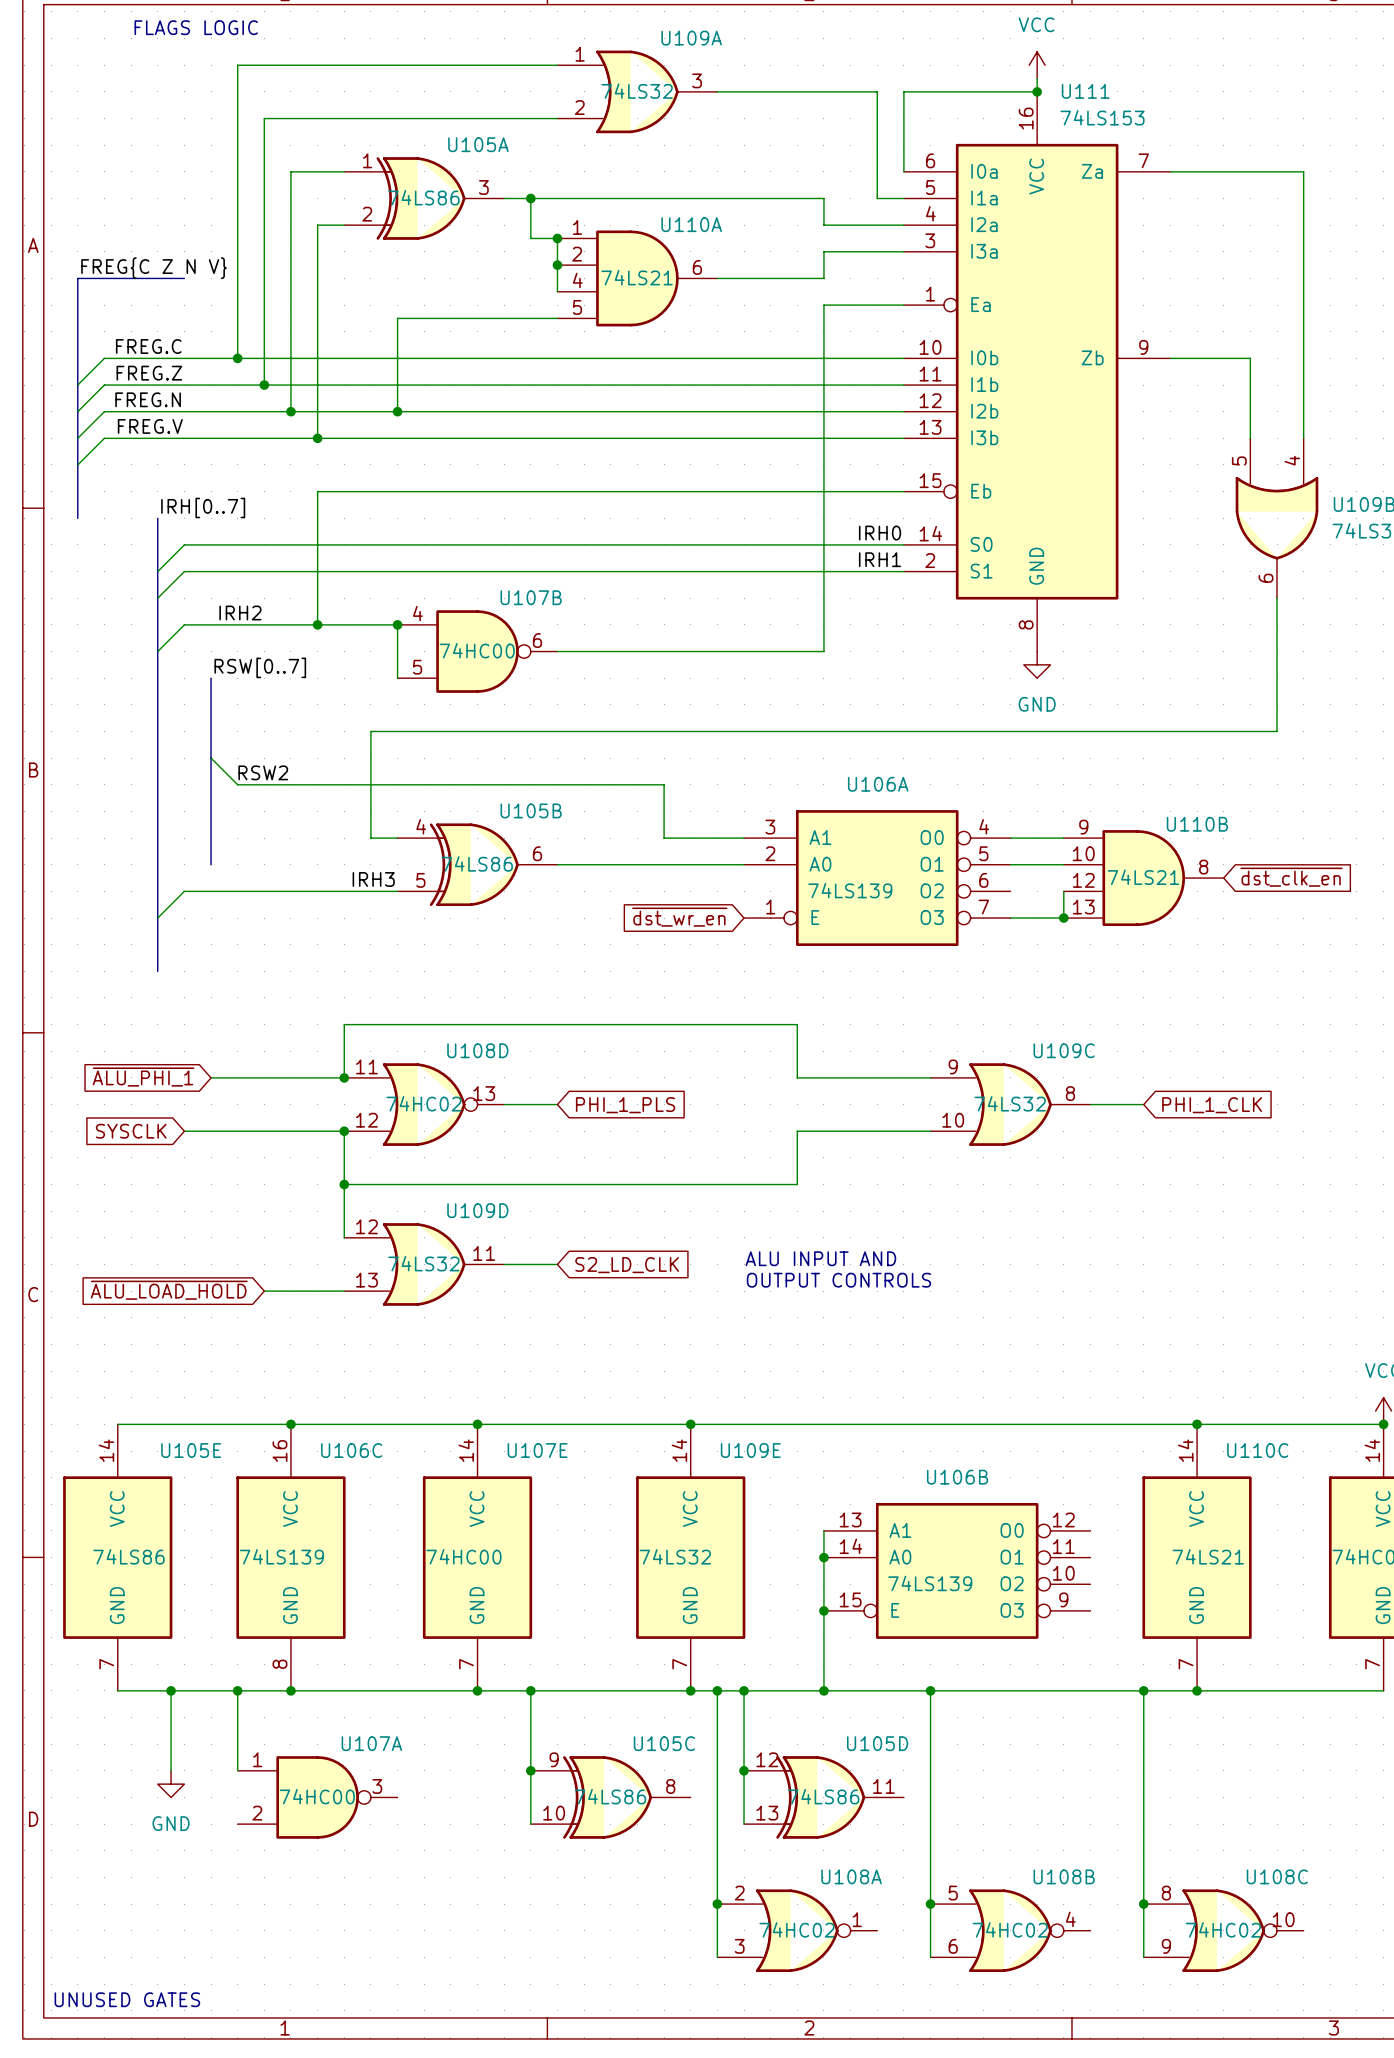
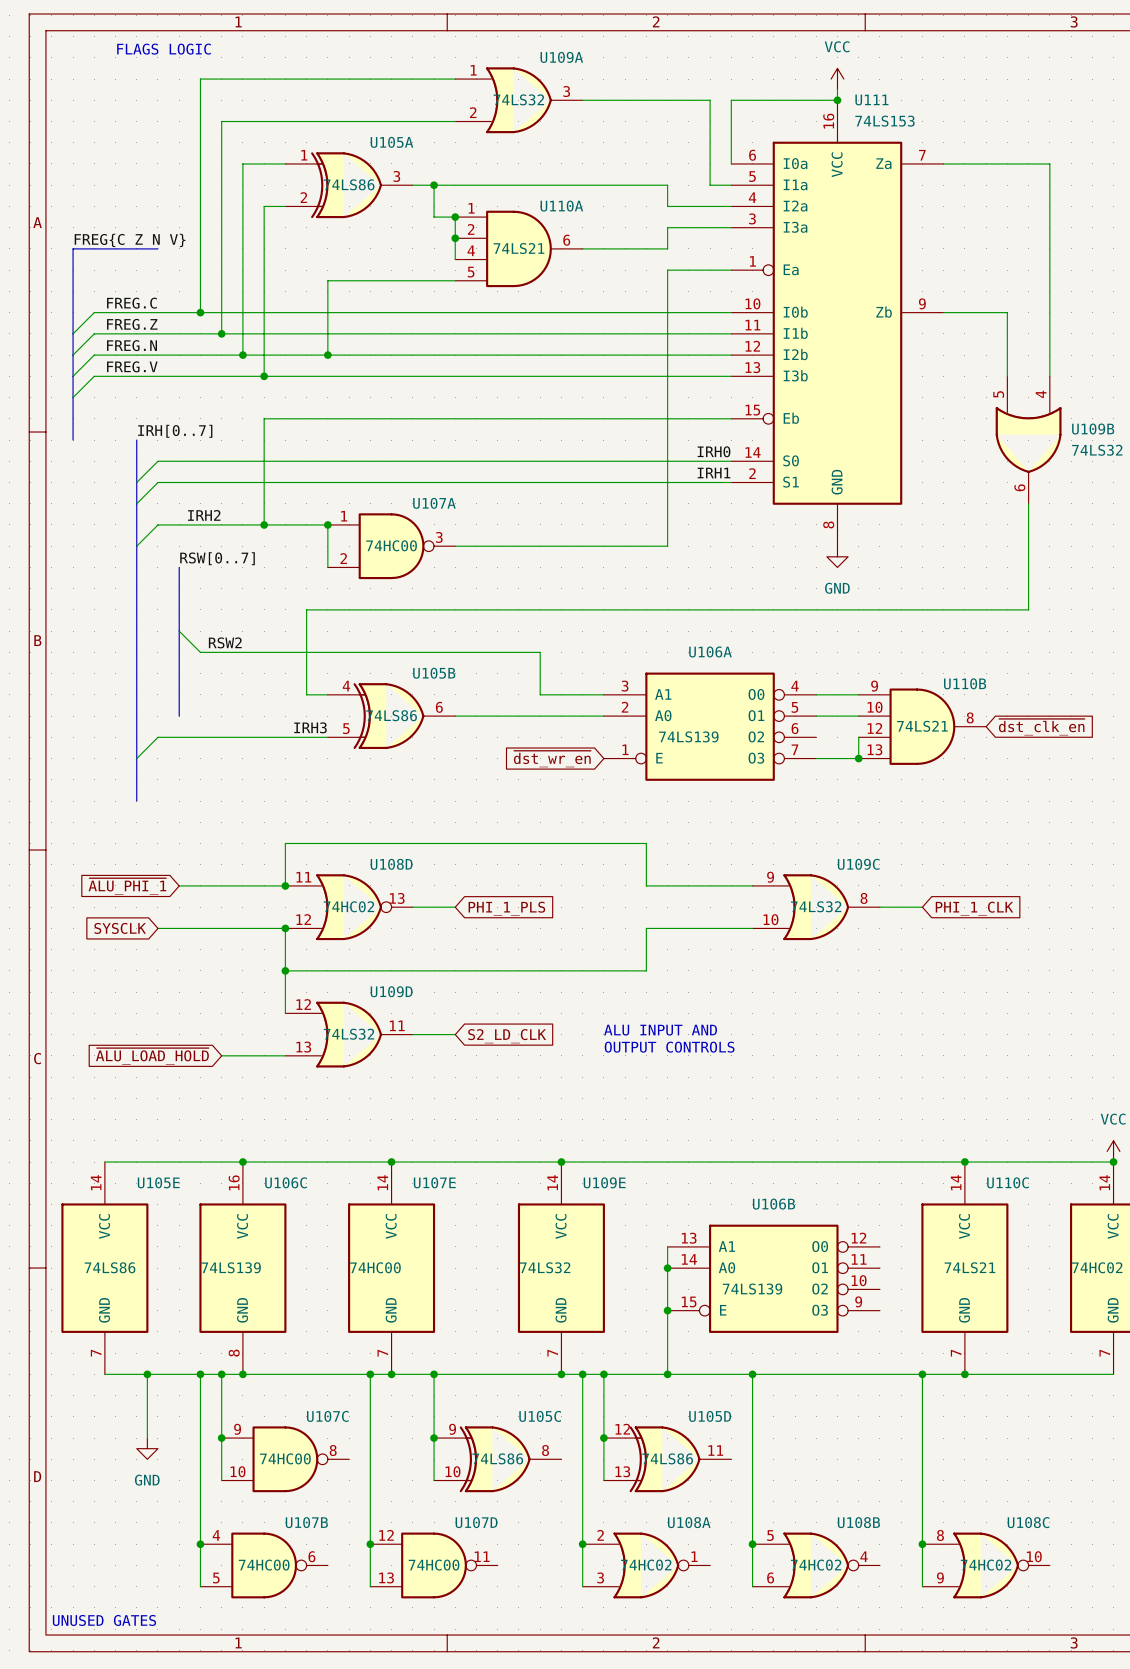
U107B position: (477, 651) -> (264, 1565)
wire: none -> (221, 1374) (221, 1480)
junction: none -> (221, 1374)
wire: none -> (370, 1374) (370, 1586)
junction: none -> (370, 1374)
wire: none -> (200, 1438) (200, 1586)
junction: none -> (221, 1438)
U107A position: (317, 1797) -> (391, 546)
U107C: none -> 74HC00 (285, 1459)
junction: none -> (200, 1544)
junction: none -> (370, 1544)
U107D: none -> 74HC00 (434, 1565)

